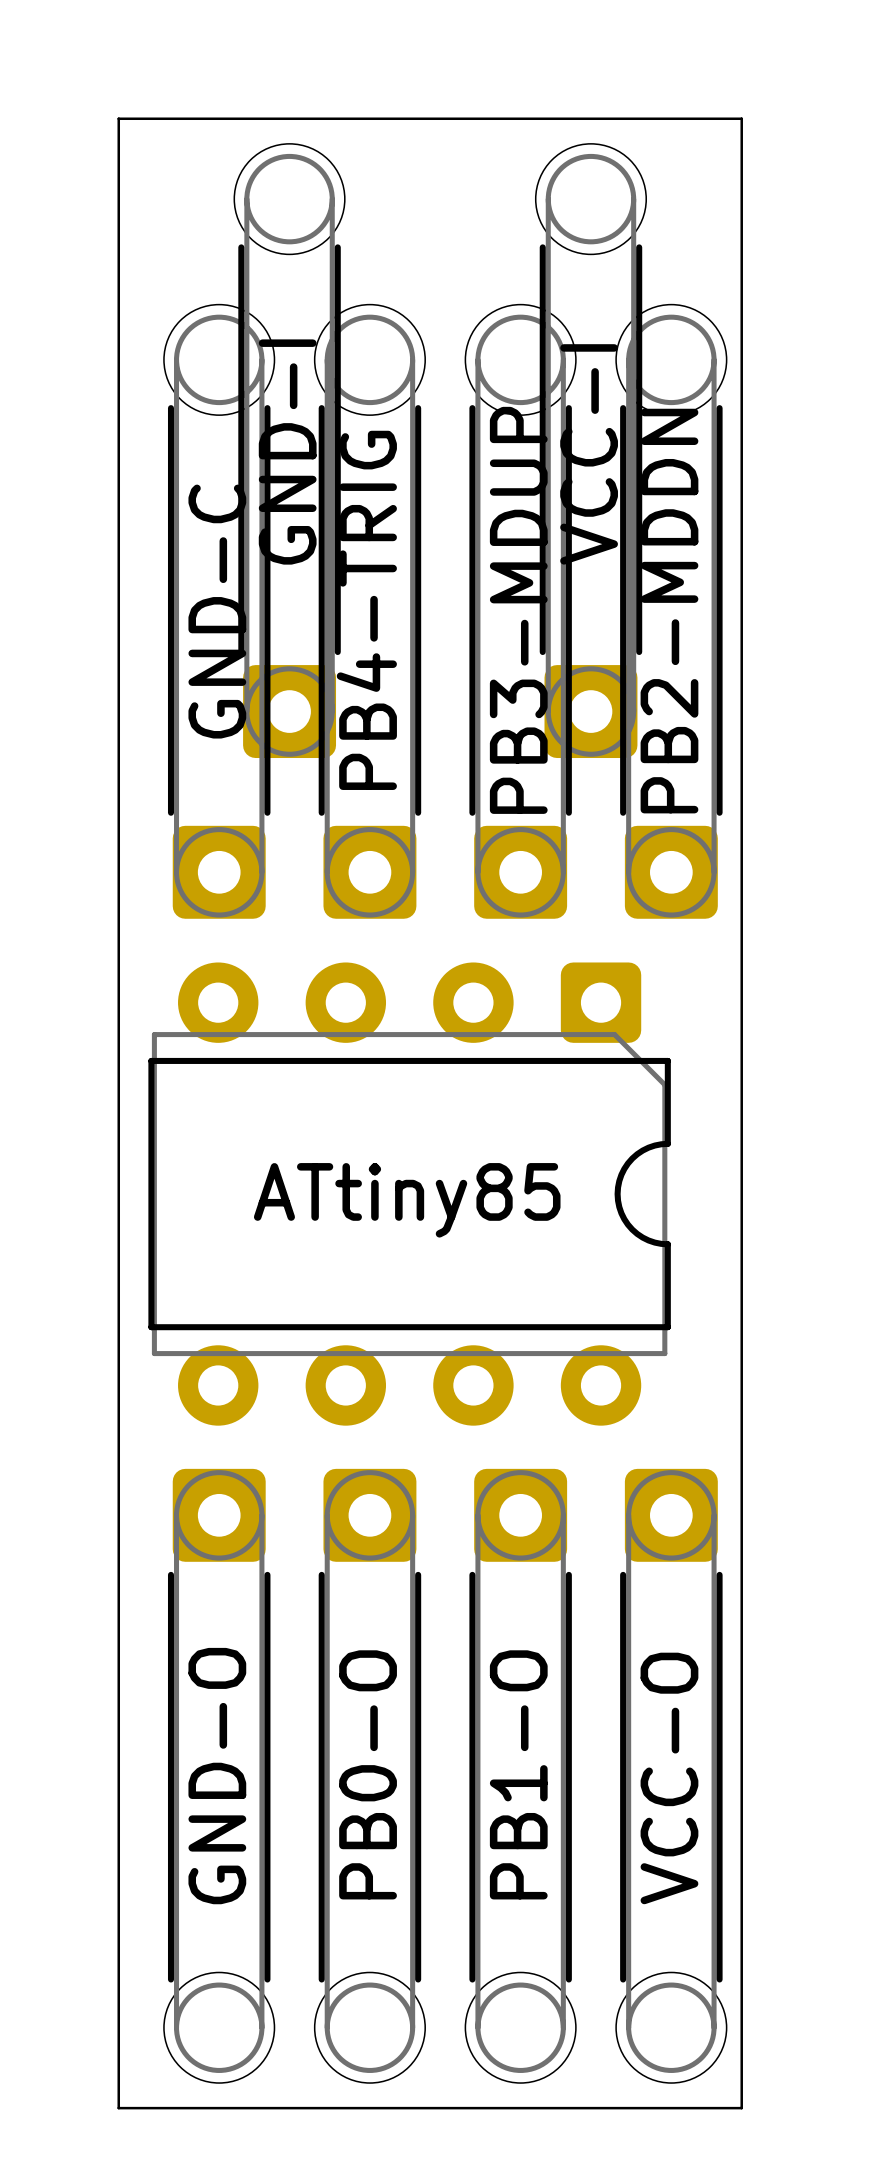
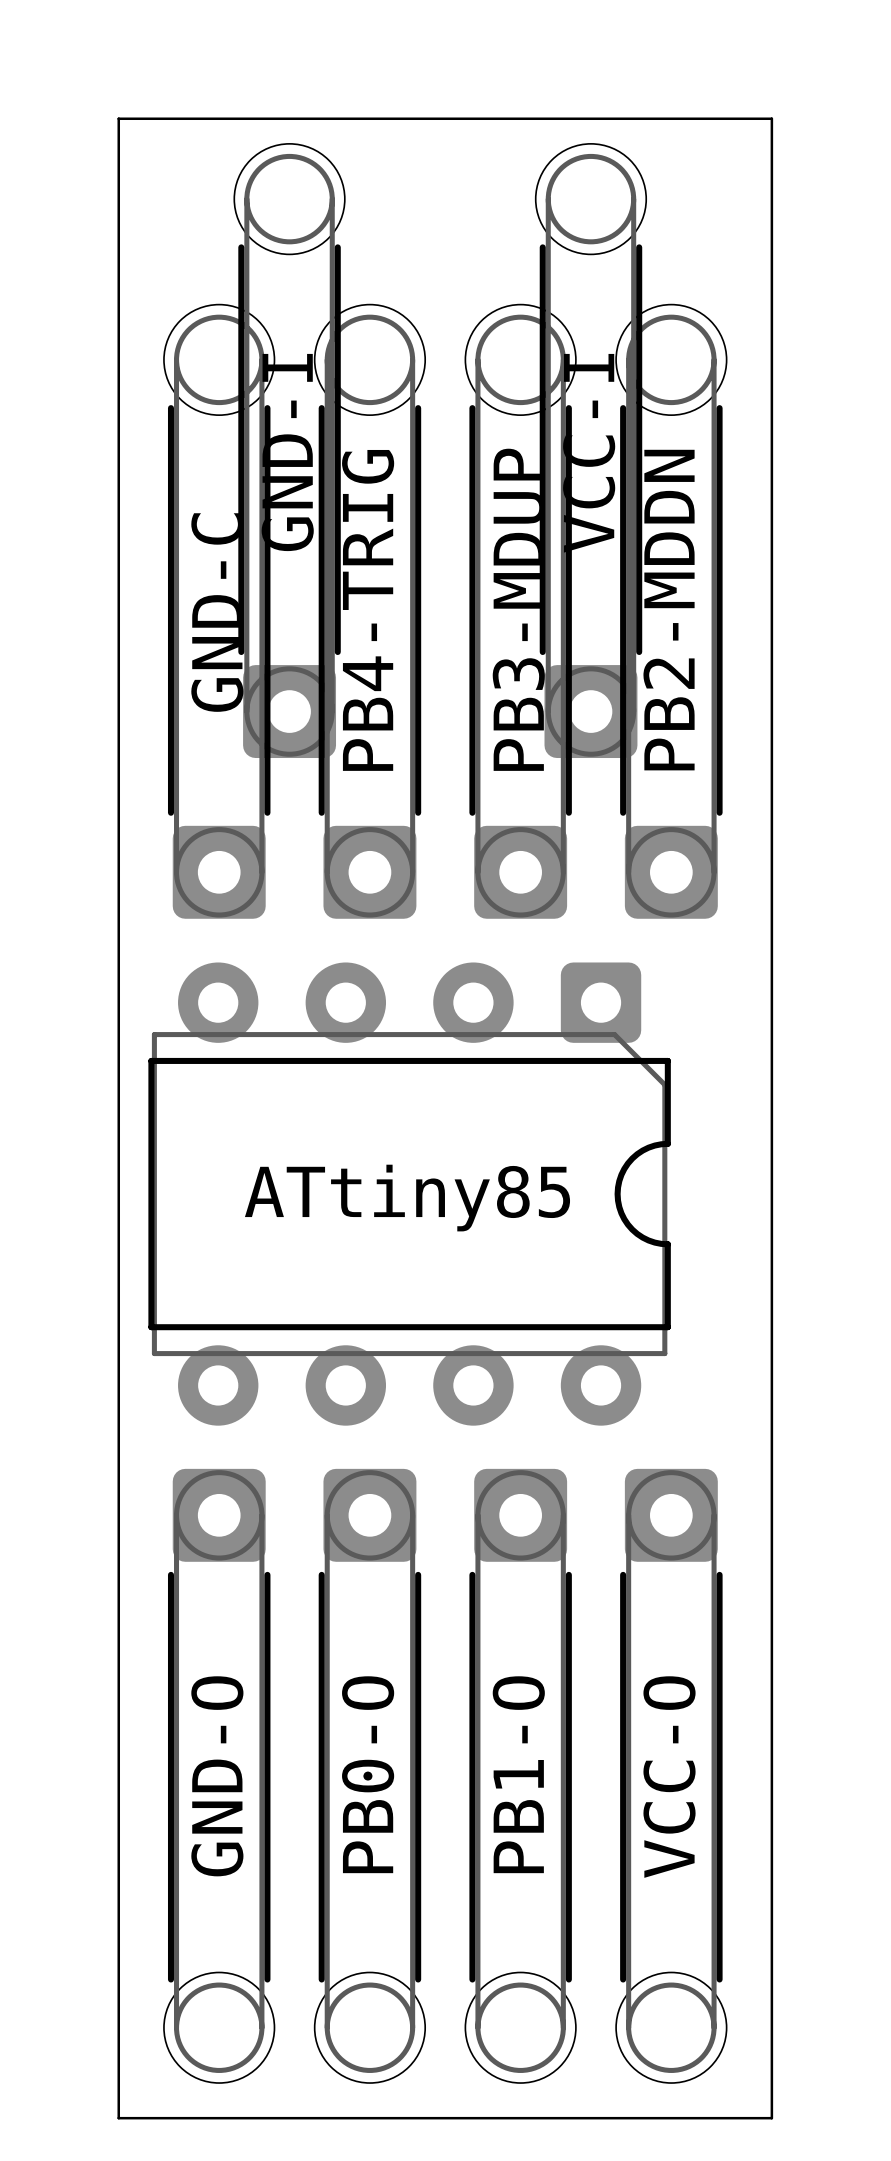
board edge: (741, 118) (741, 2108) (118, 2108) -> (741, 118) (771, 118) (771, 2118) (118, 2118) (118, 2108)

